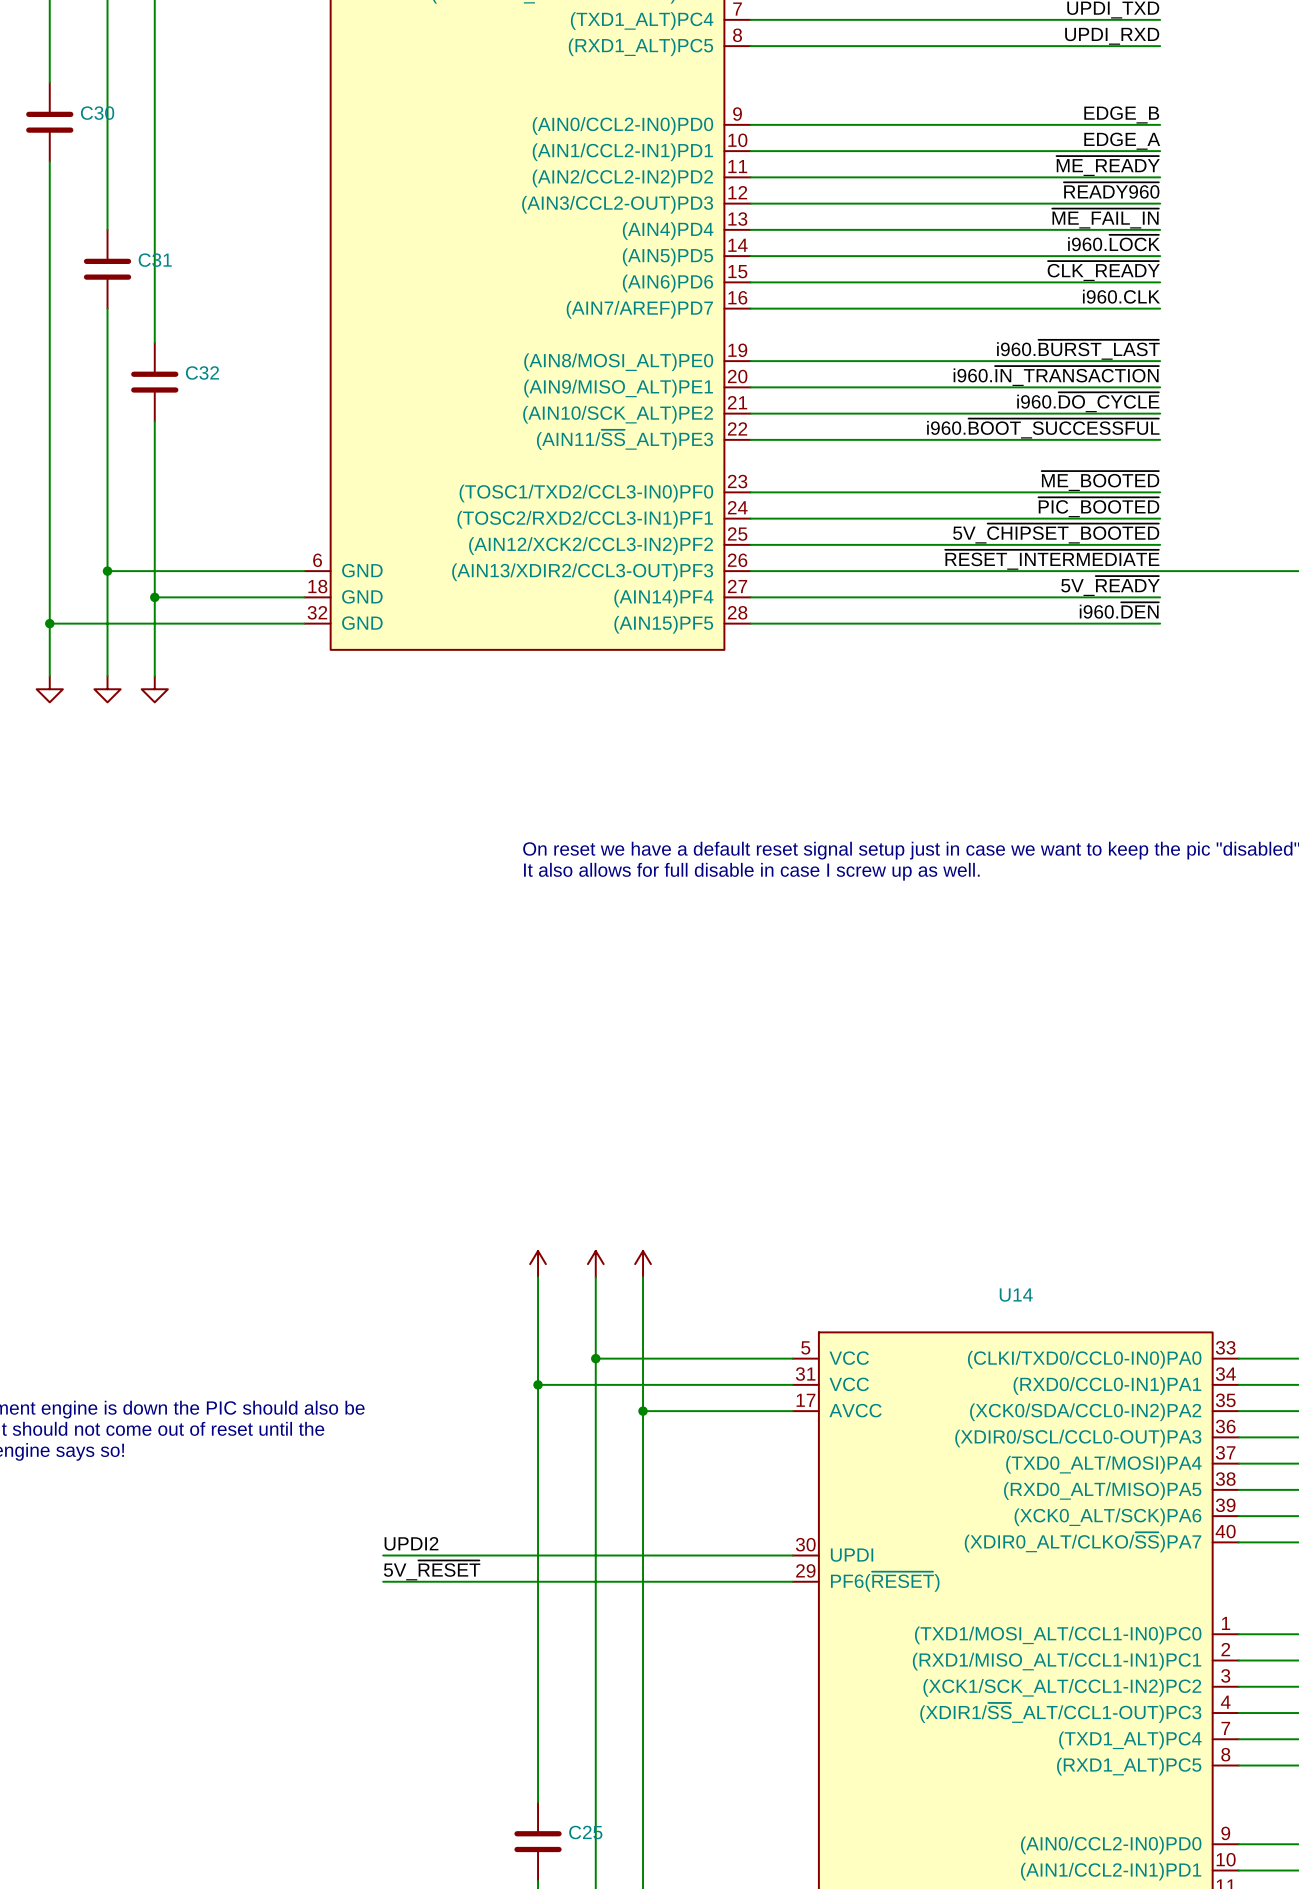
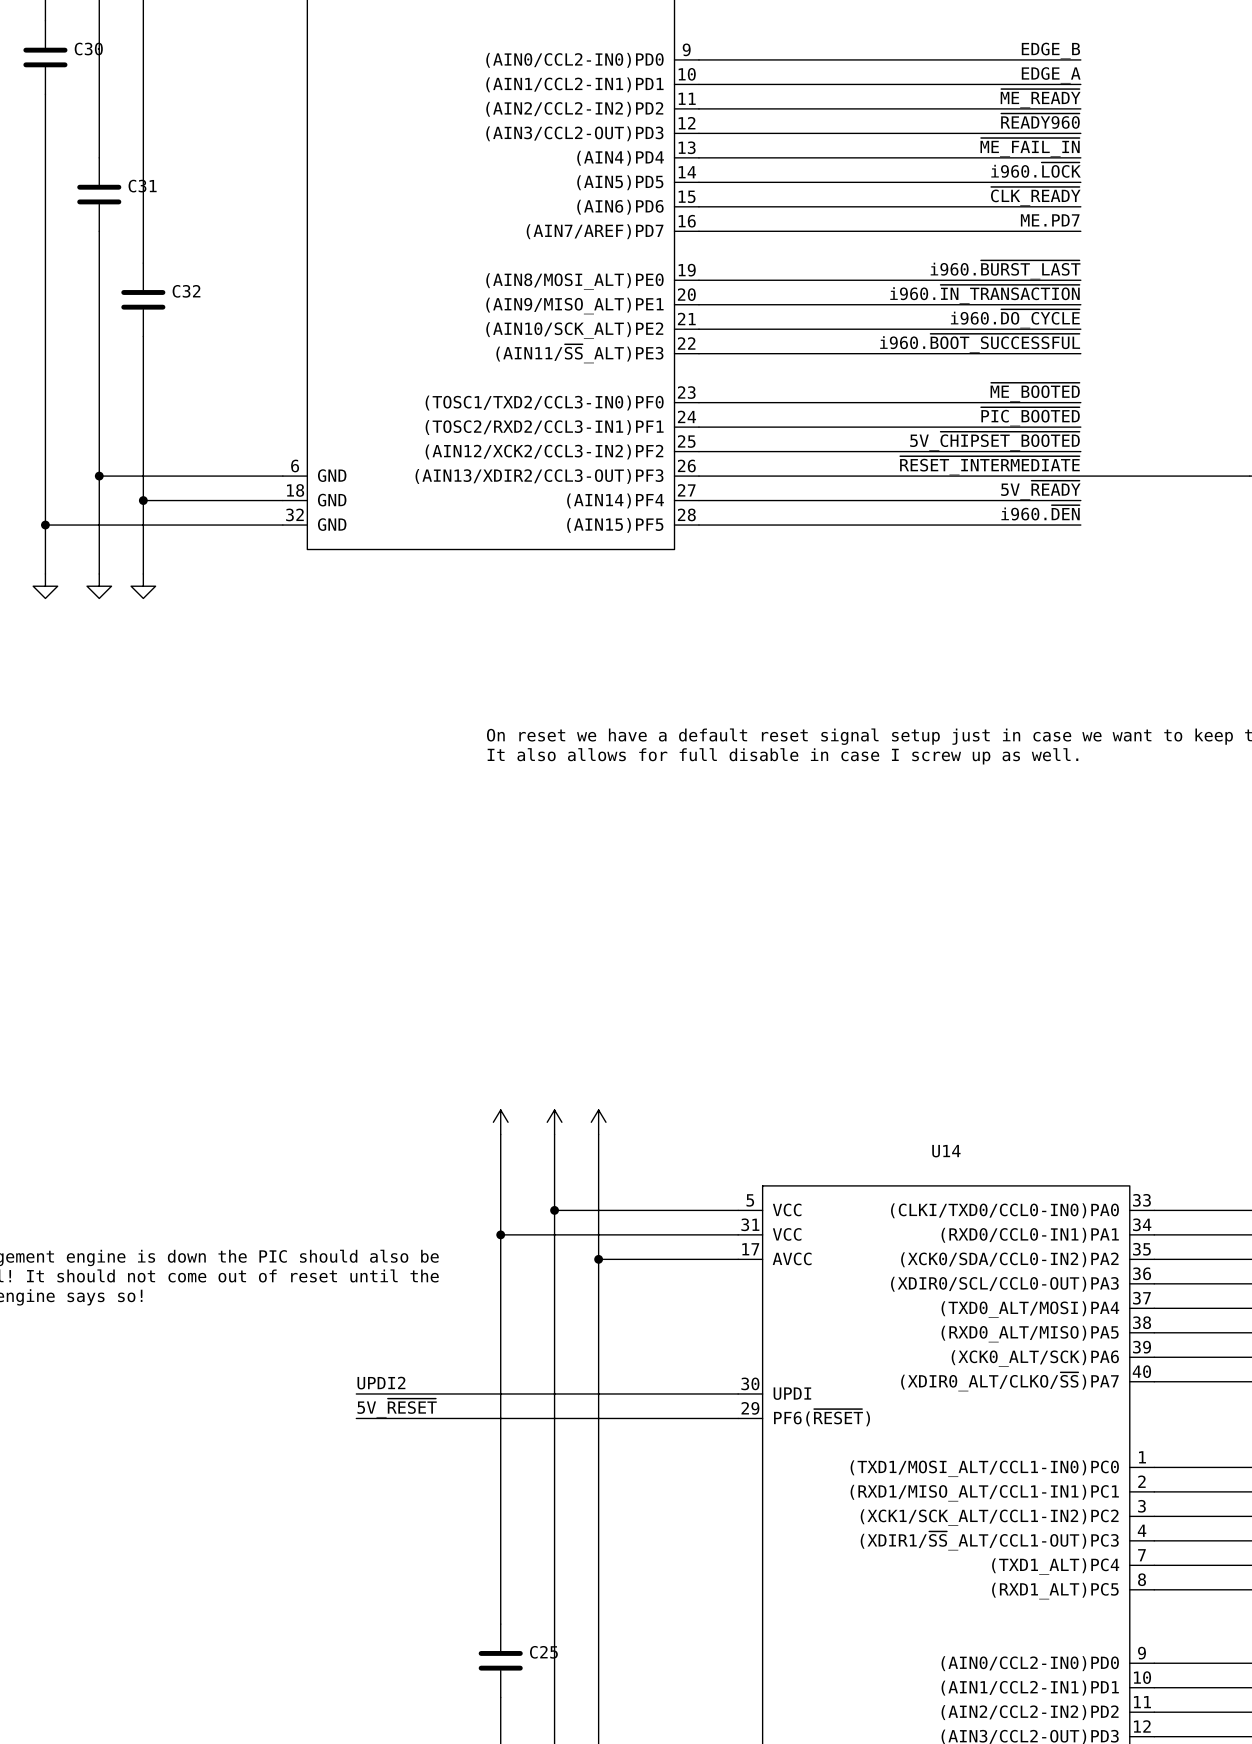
label: i960.CLK (1121, 296) -> ME.PD7 (1050, 220)

